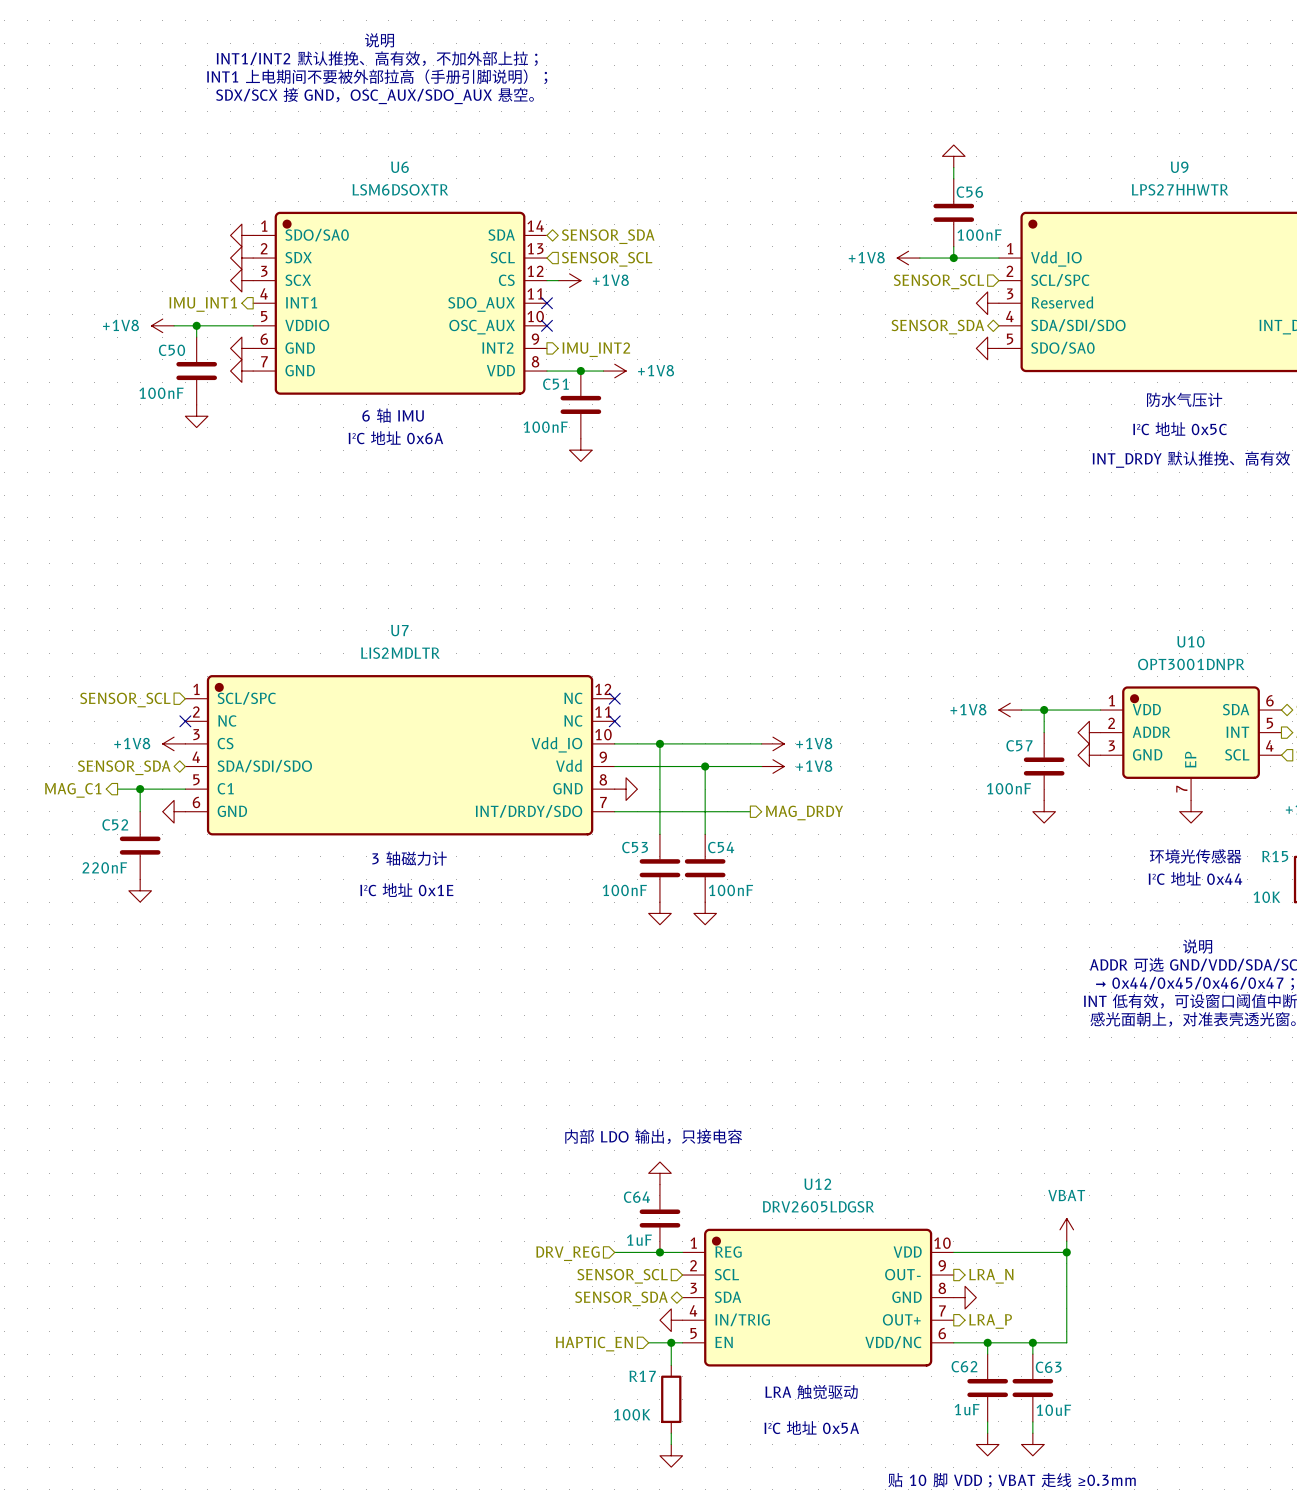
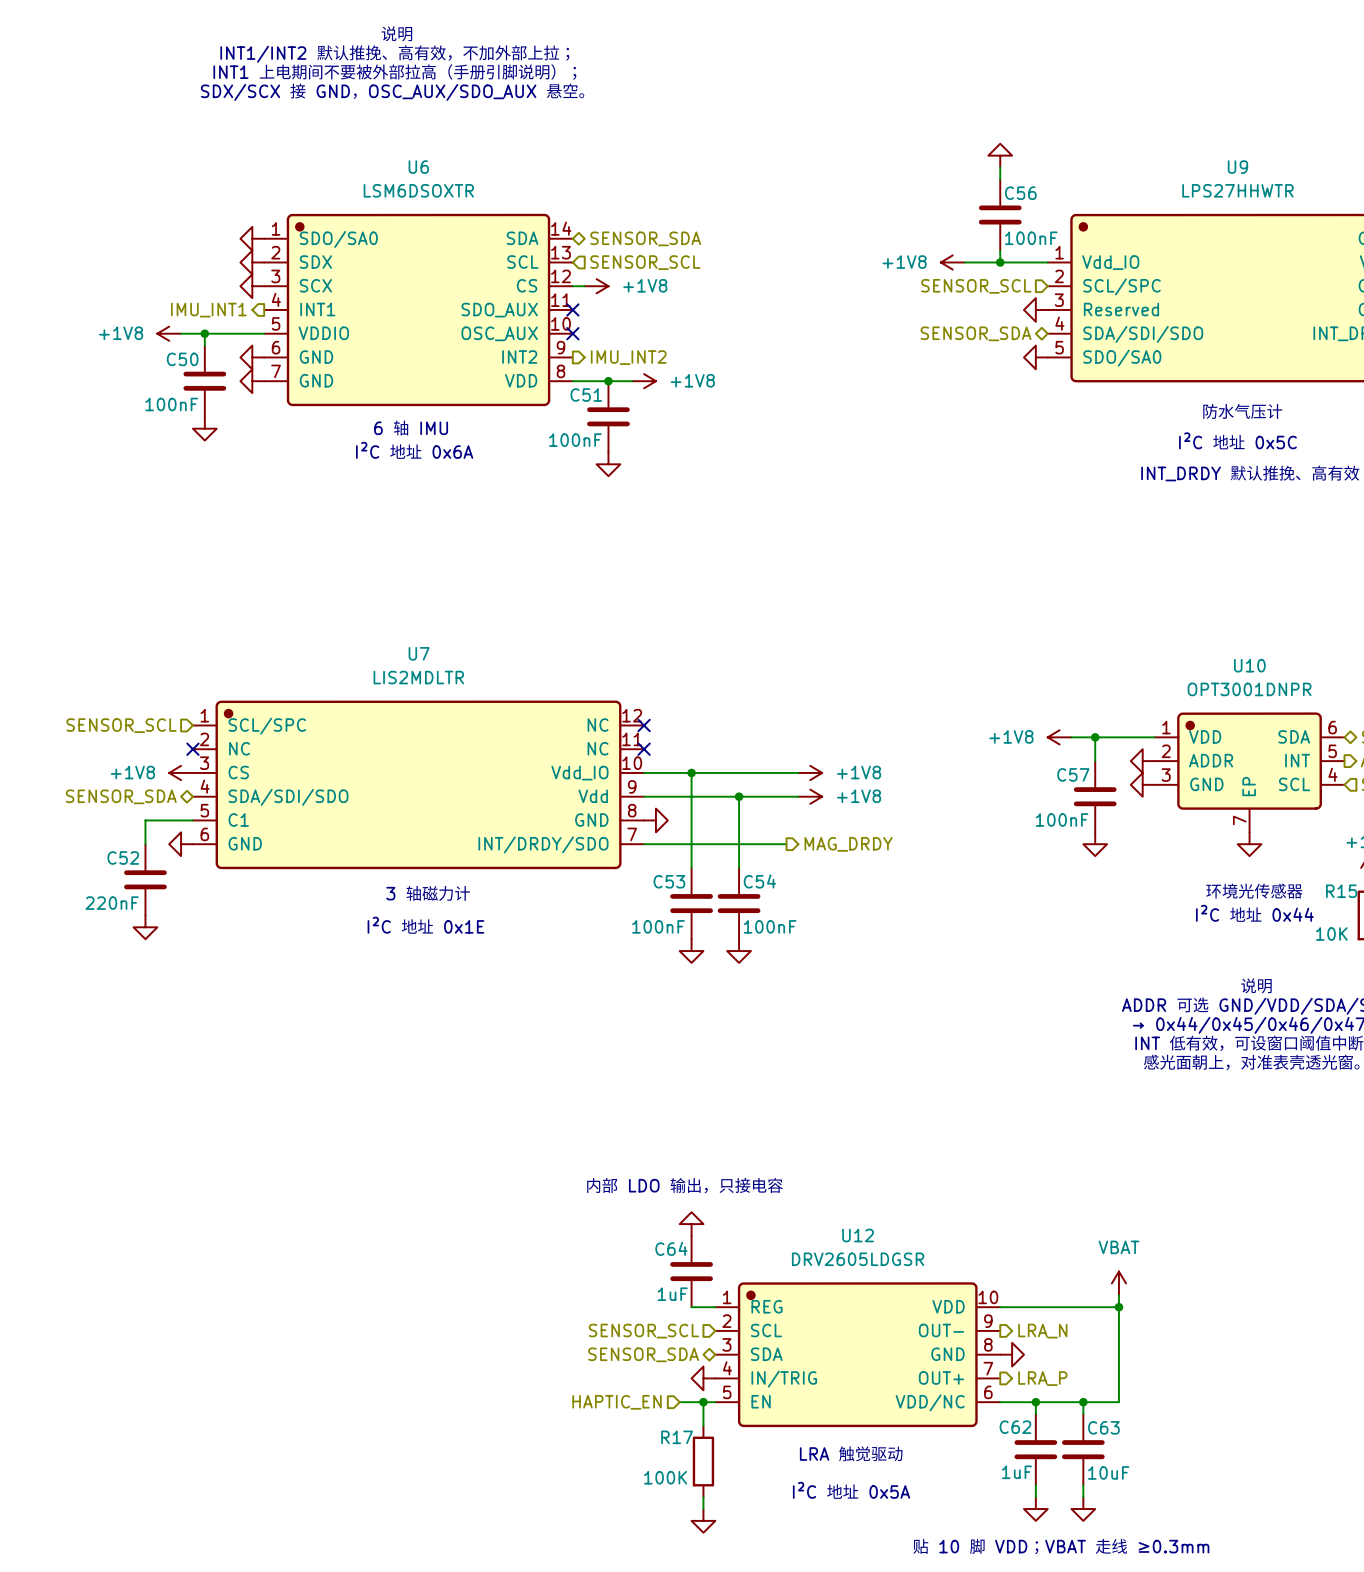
wire: (117, 789) (140, 789) -> none
junction: (140, 789) -> none
hierarchical label: MAG_C1 (73, 790) -> none
wire: (614, 1252) (659, 1252) -> none
junction: (659, 1252) -> none
hierarchical label: DRV_REG (567, 1253) -> none

